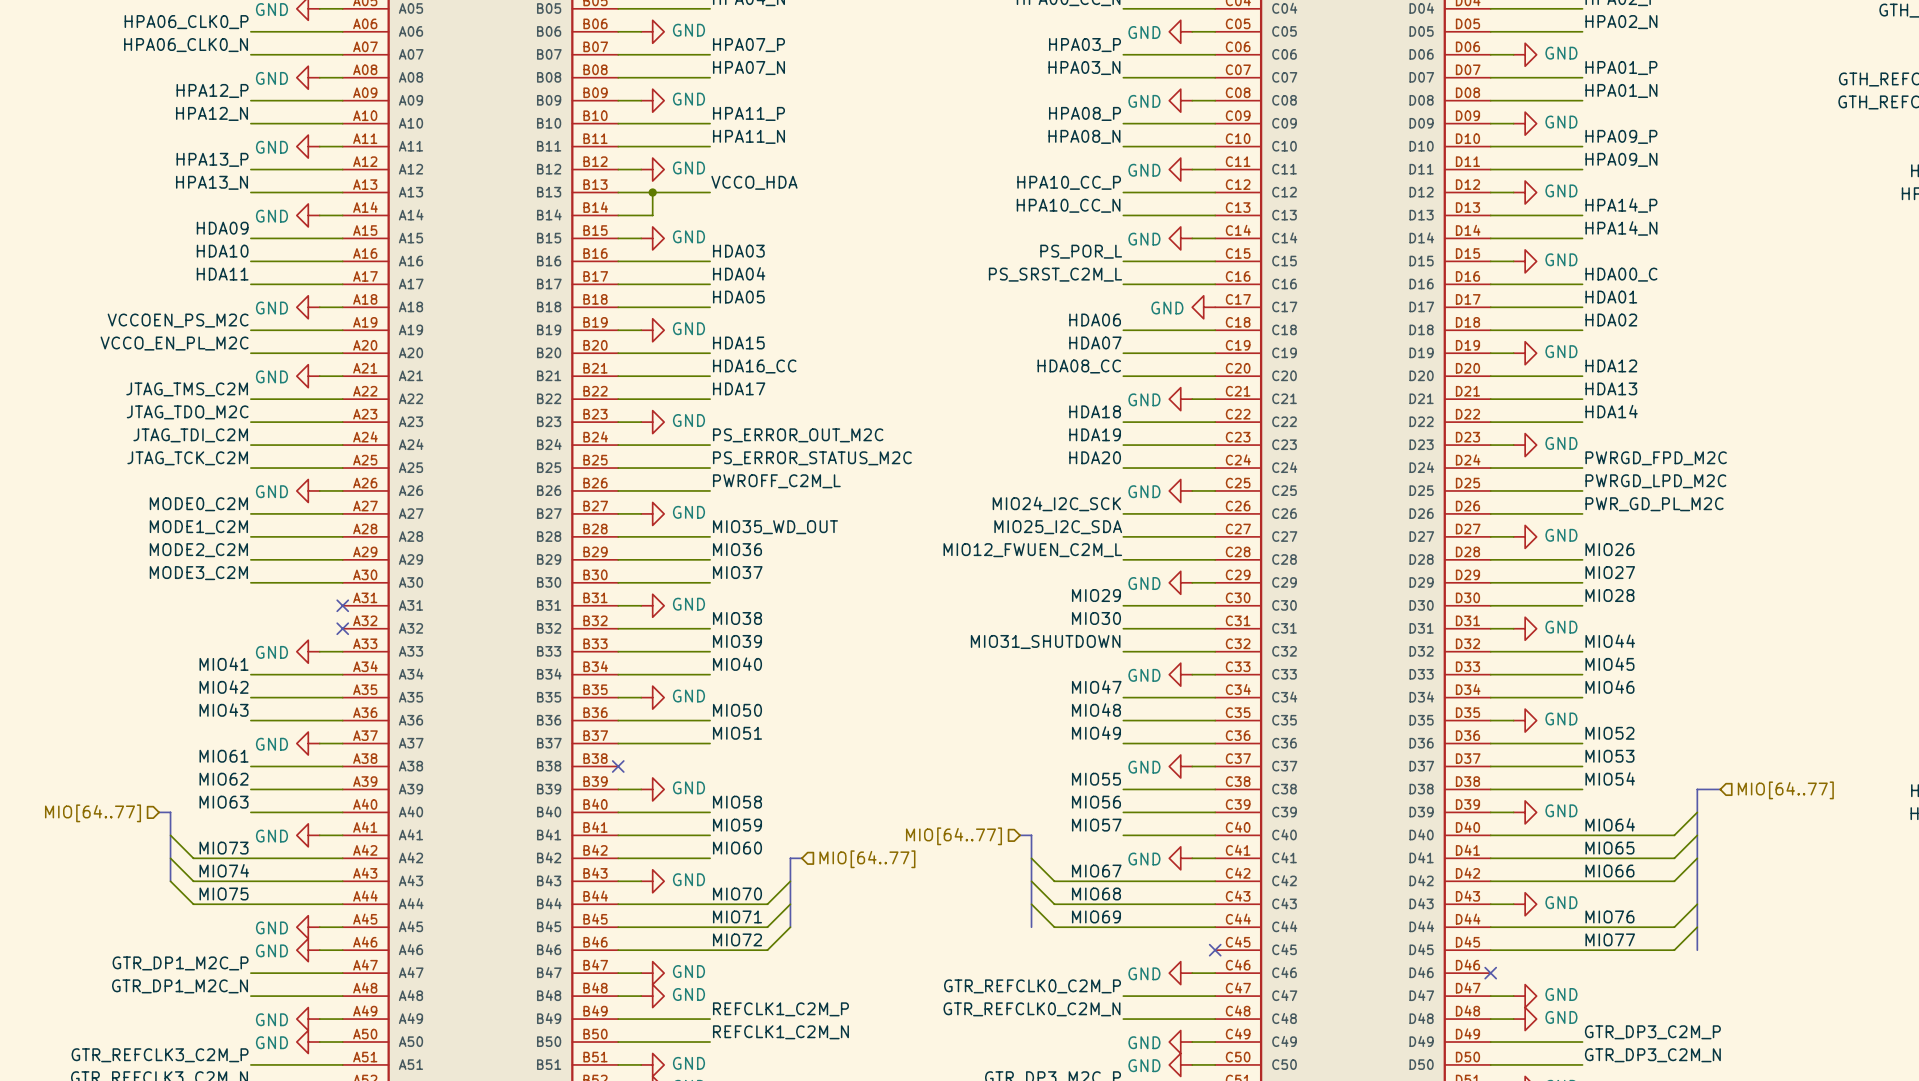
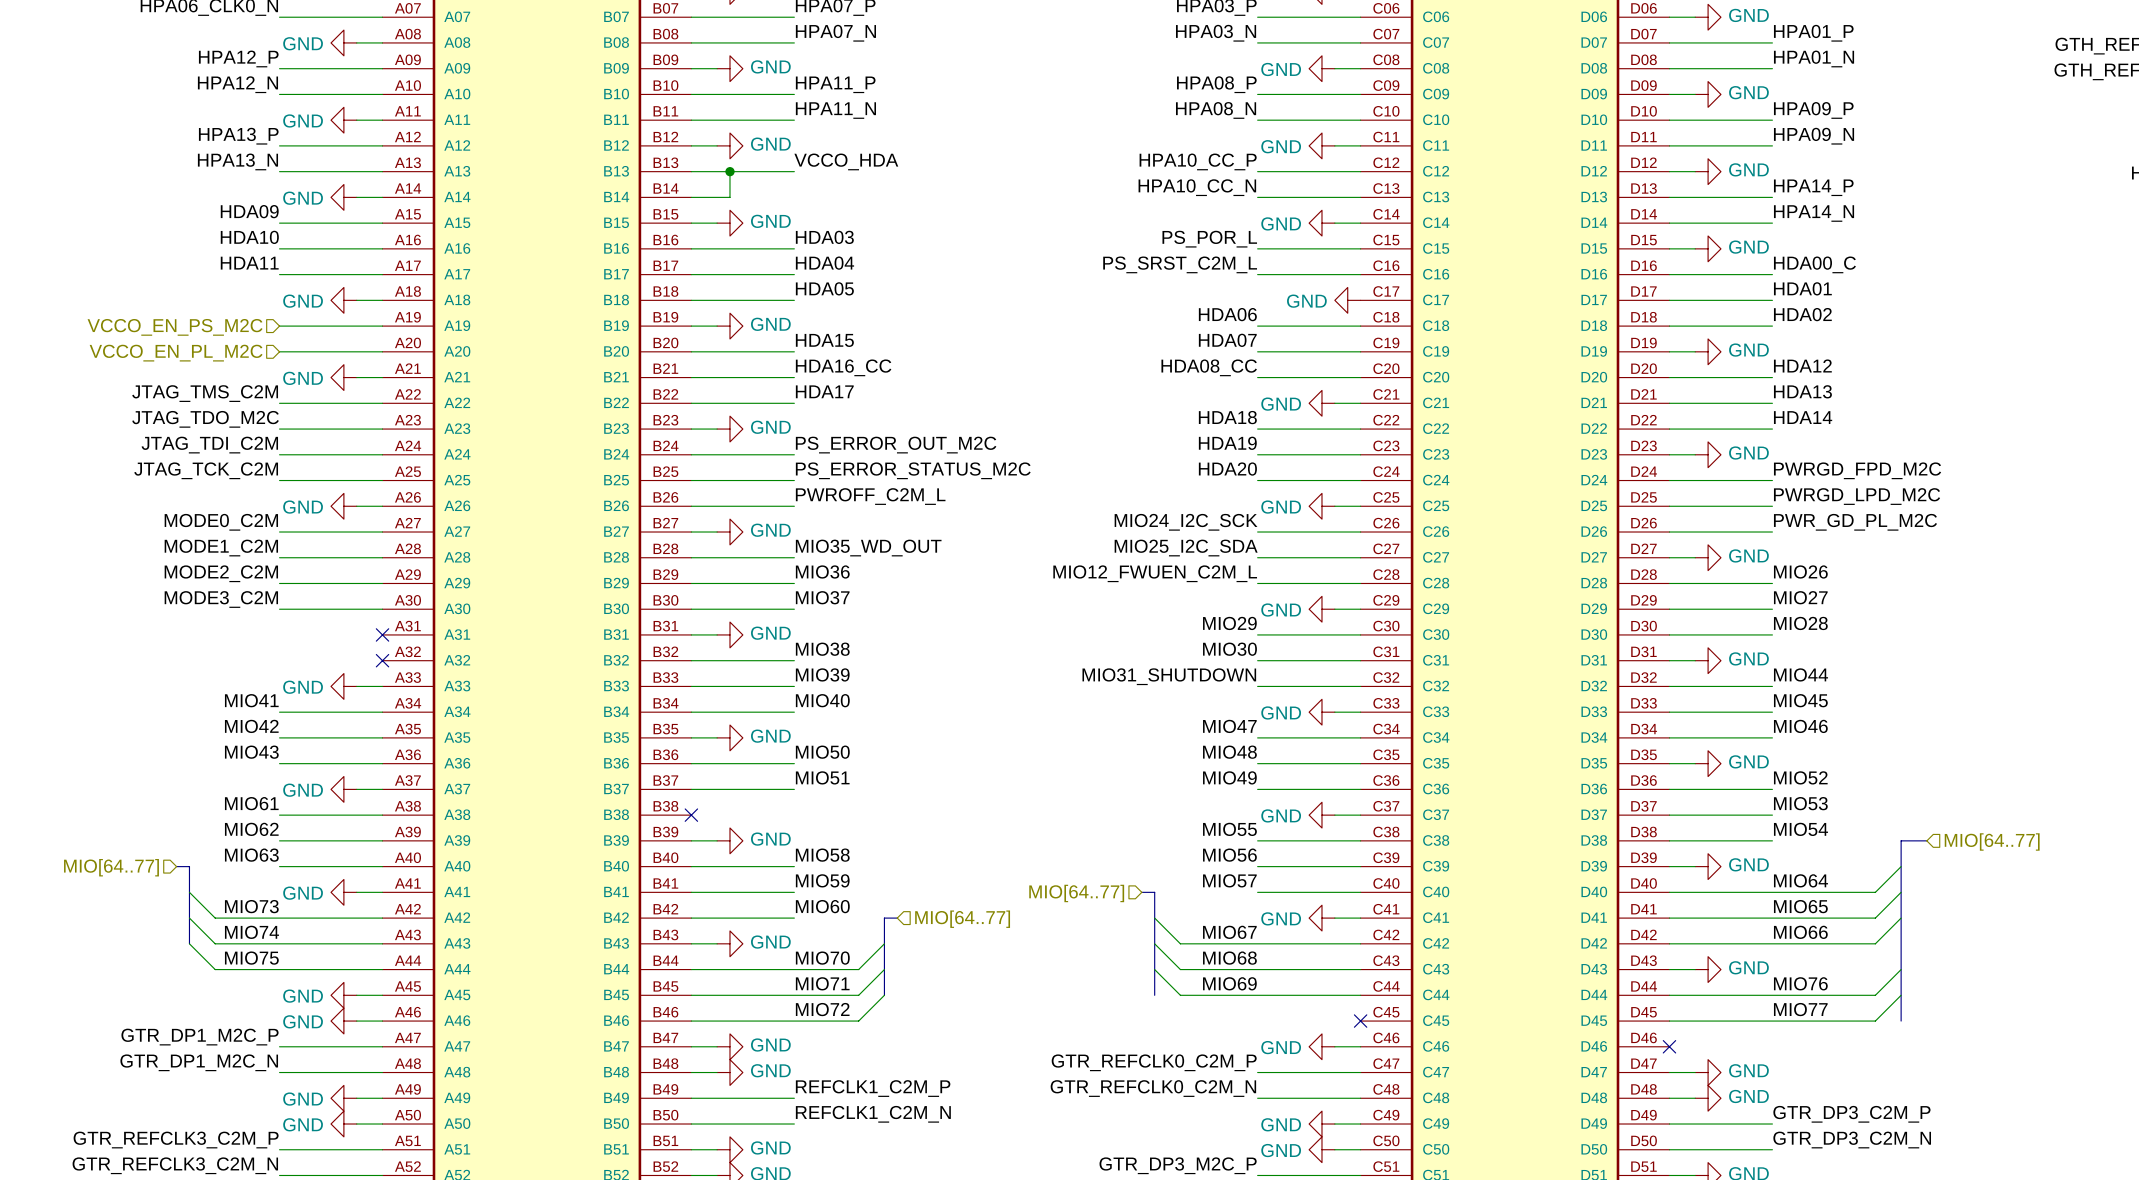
label: VCCOEN_PS_M2C (178, 320) -> none
hierarchical label: none -> VCCO_EN_PS_M2C (175, 327)
label: VCCO_EN_PL_M2C (174, 343) -> none
hierarchical label: none -> VCCO_EN_PL_M2C (176, 353)

